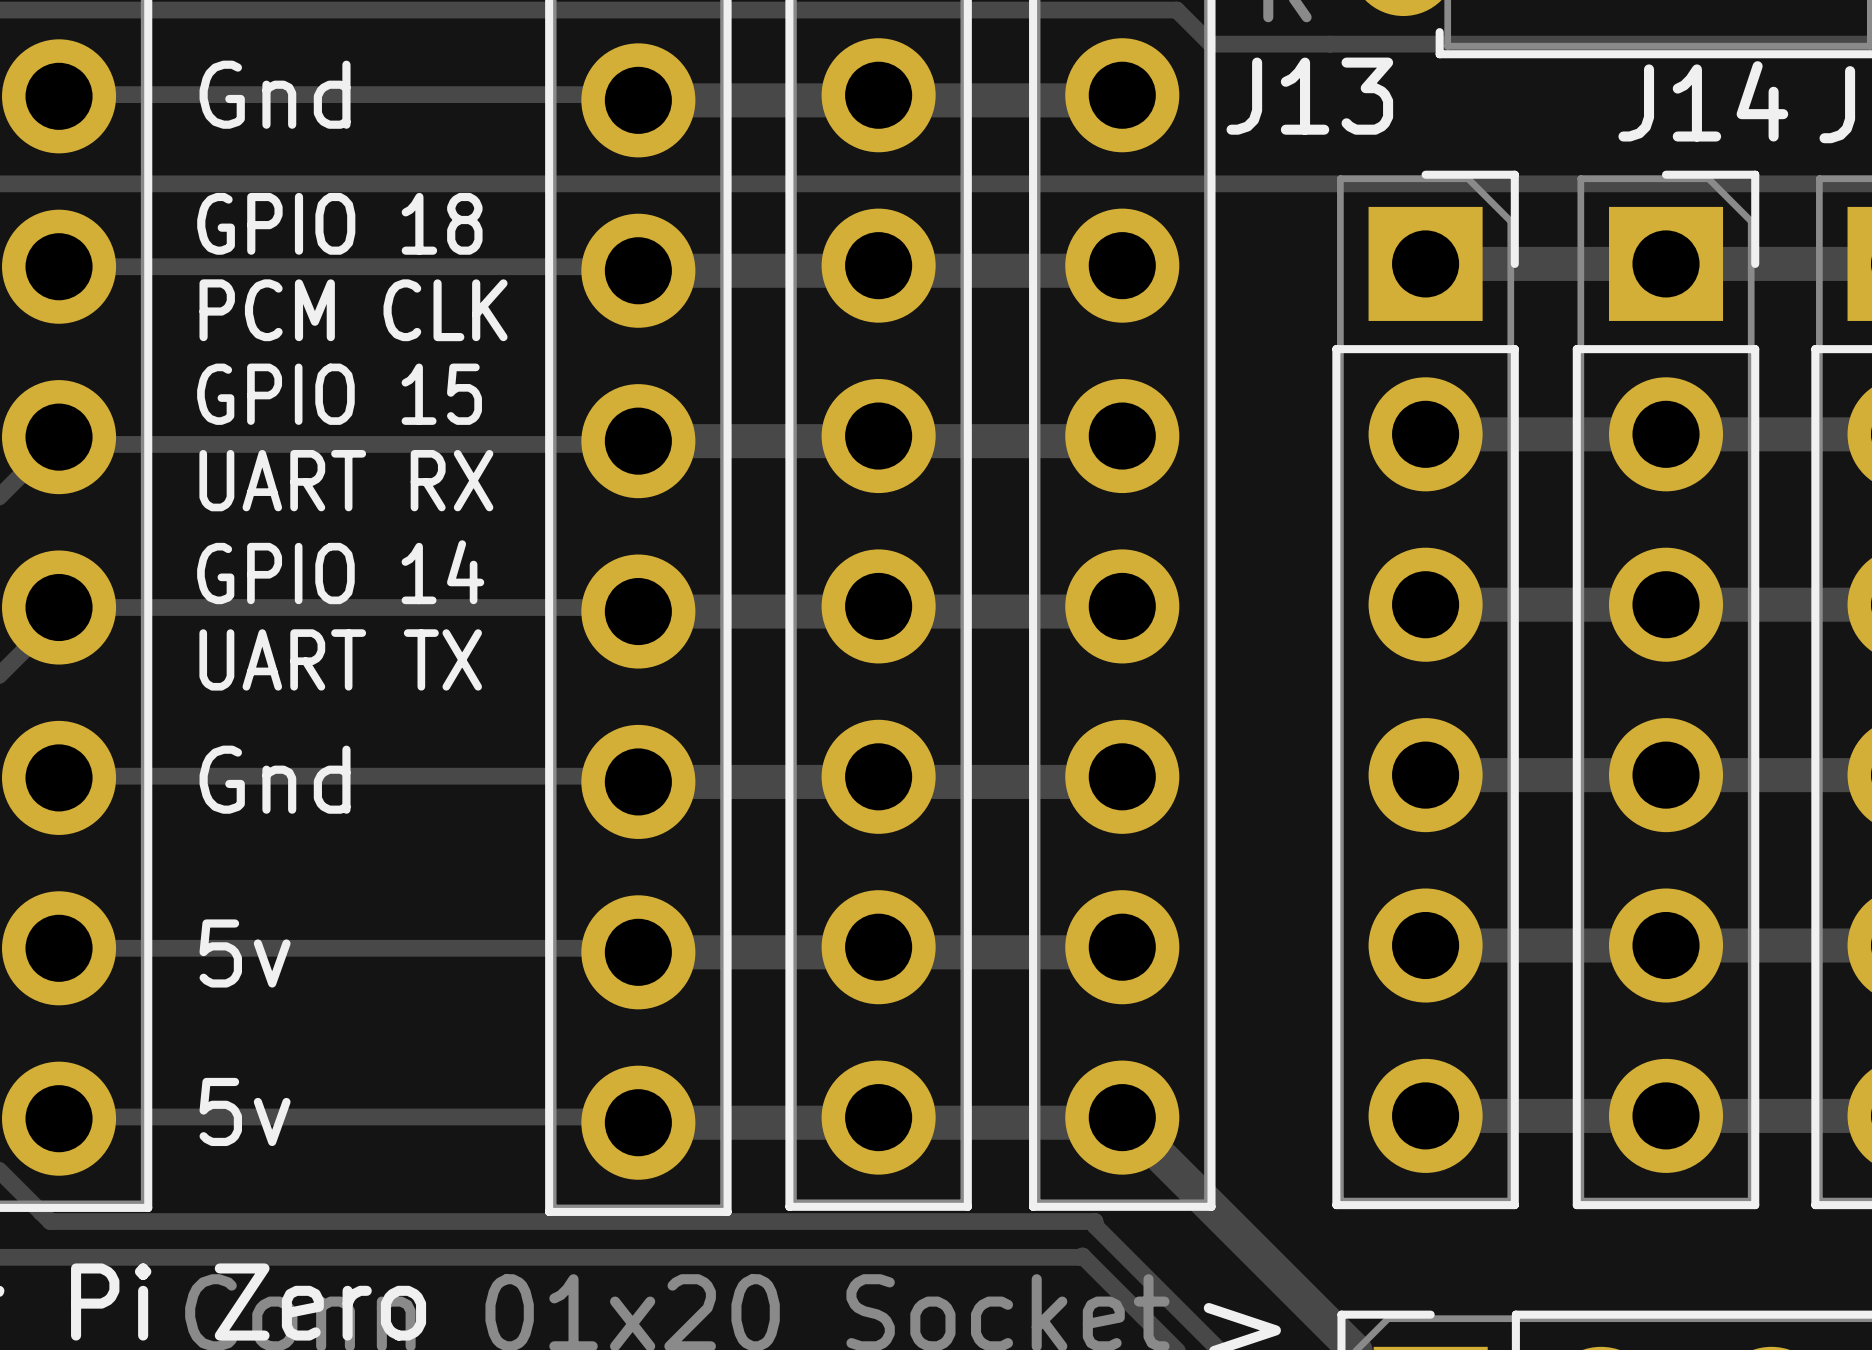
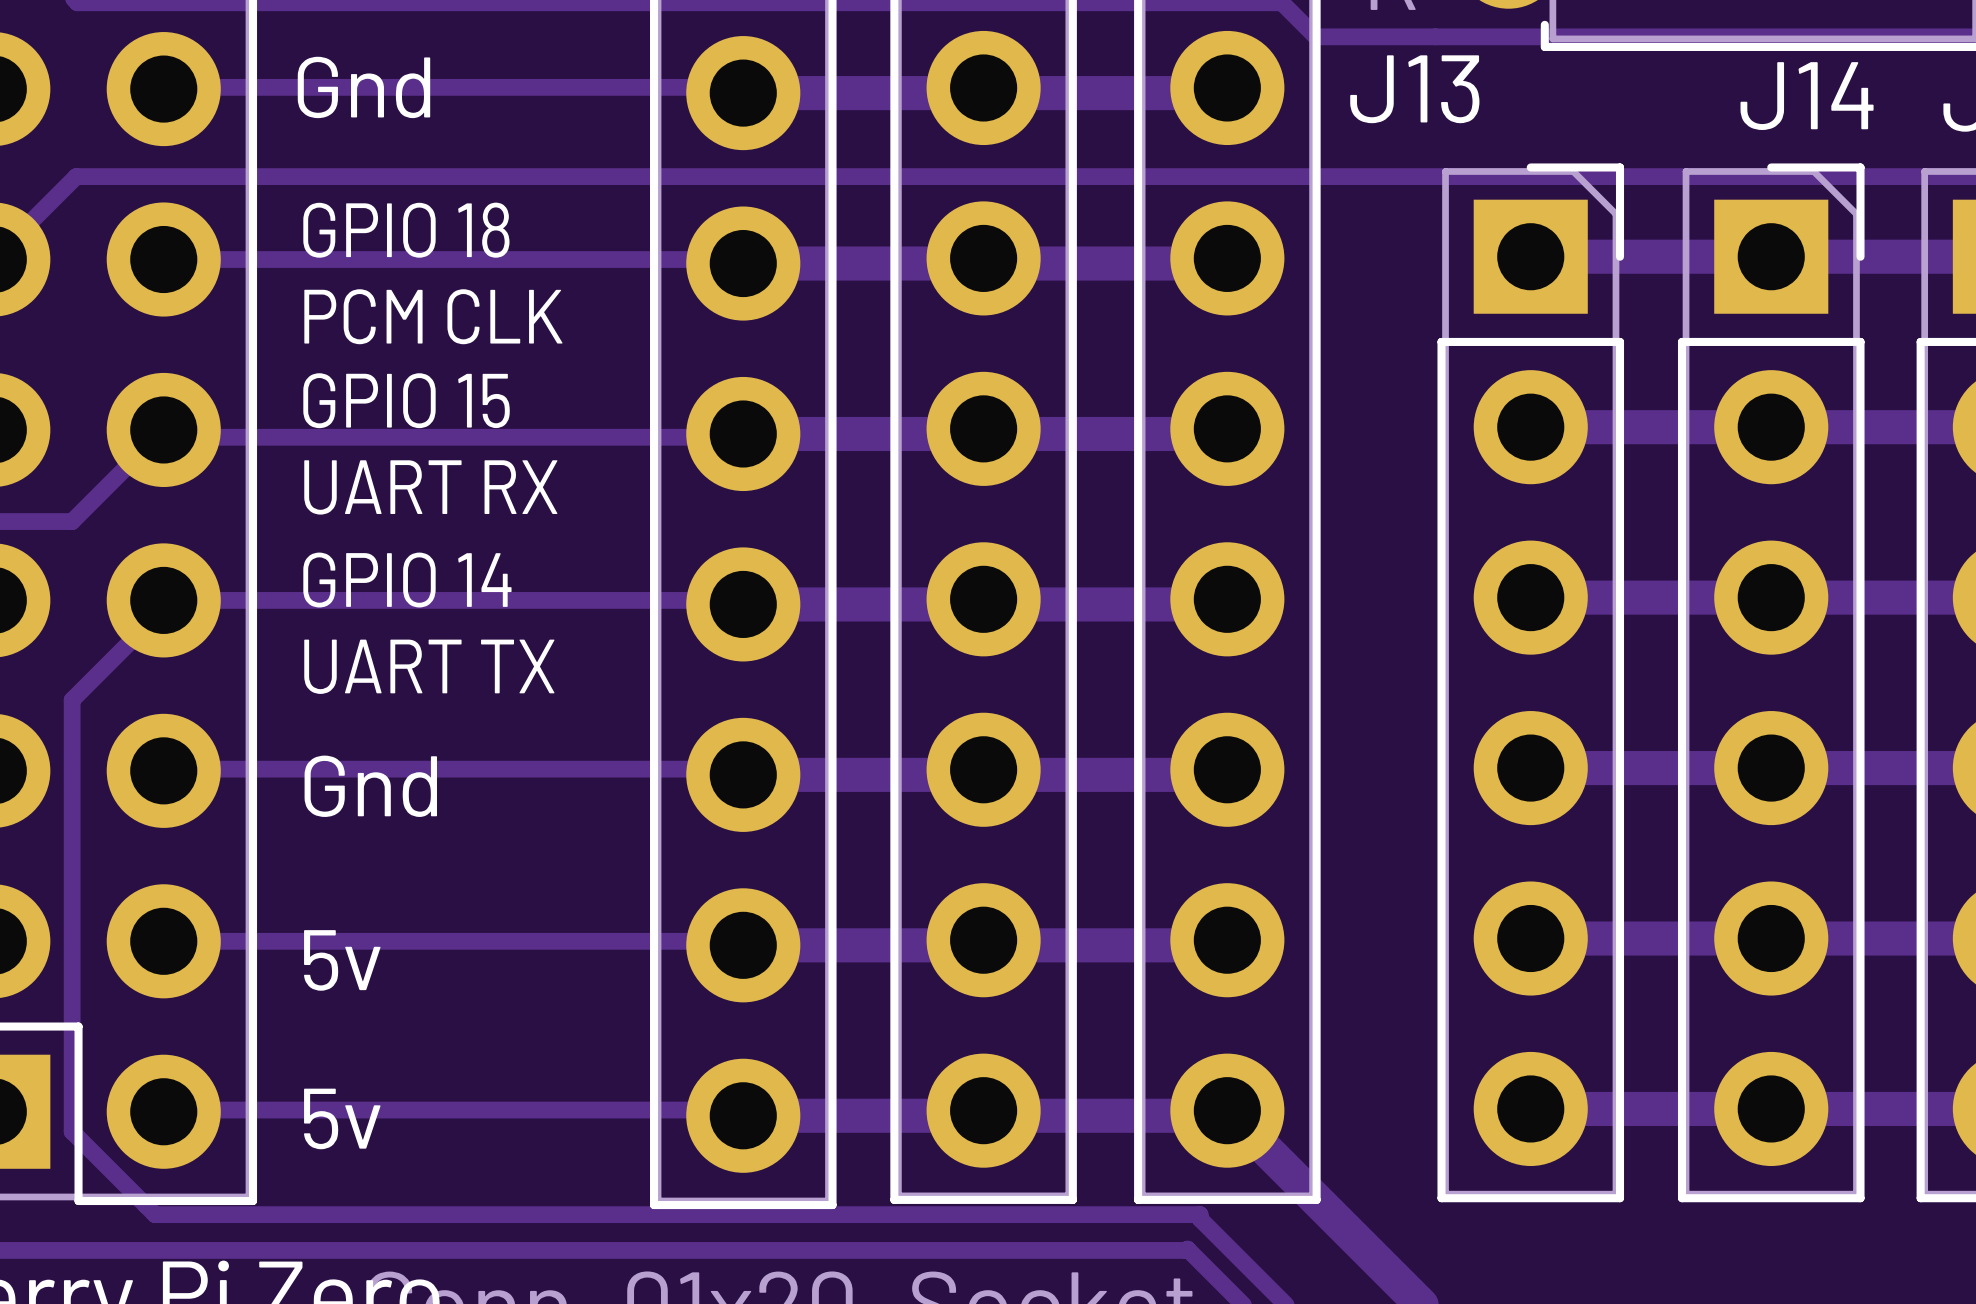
text position: GPIO 18 (339, 223) -> GPIO 18 (406, 230)
text position: PCM CLK (353, 310) -> PCM CLK (433, 316)
text position: GPIO 15 (339, 394) -> GPIO 15 (406, 400)
text position: UART RX (346, 480) -> UART RX (430, 487)
text position: GPIO 14 (340, 572) -> GPIO 14 (407, 580)
text position: UART TX (340, 659) -> UART TX (429, 666)
text position: Gnd (275, 779) -> Gnd (370, 786)
text position: 5v (245, 953) -> 5v (342, 960)
text position: 5v (245, 1111) -> 5v (342, 1118)

